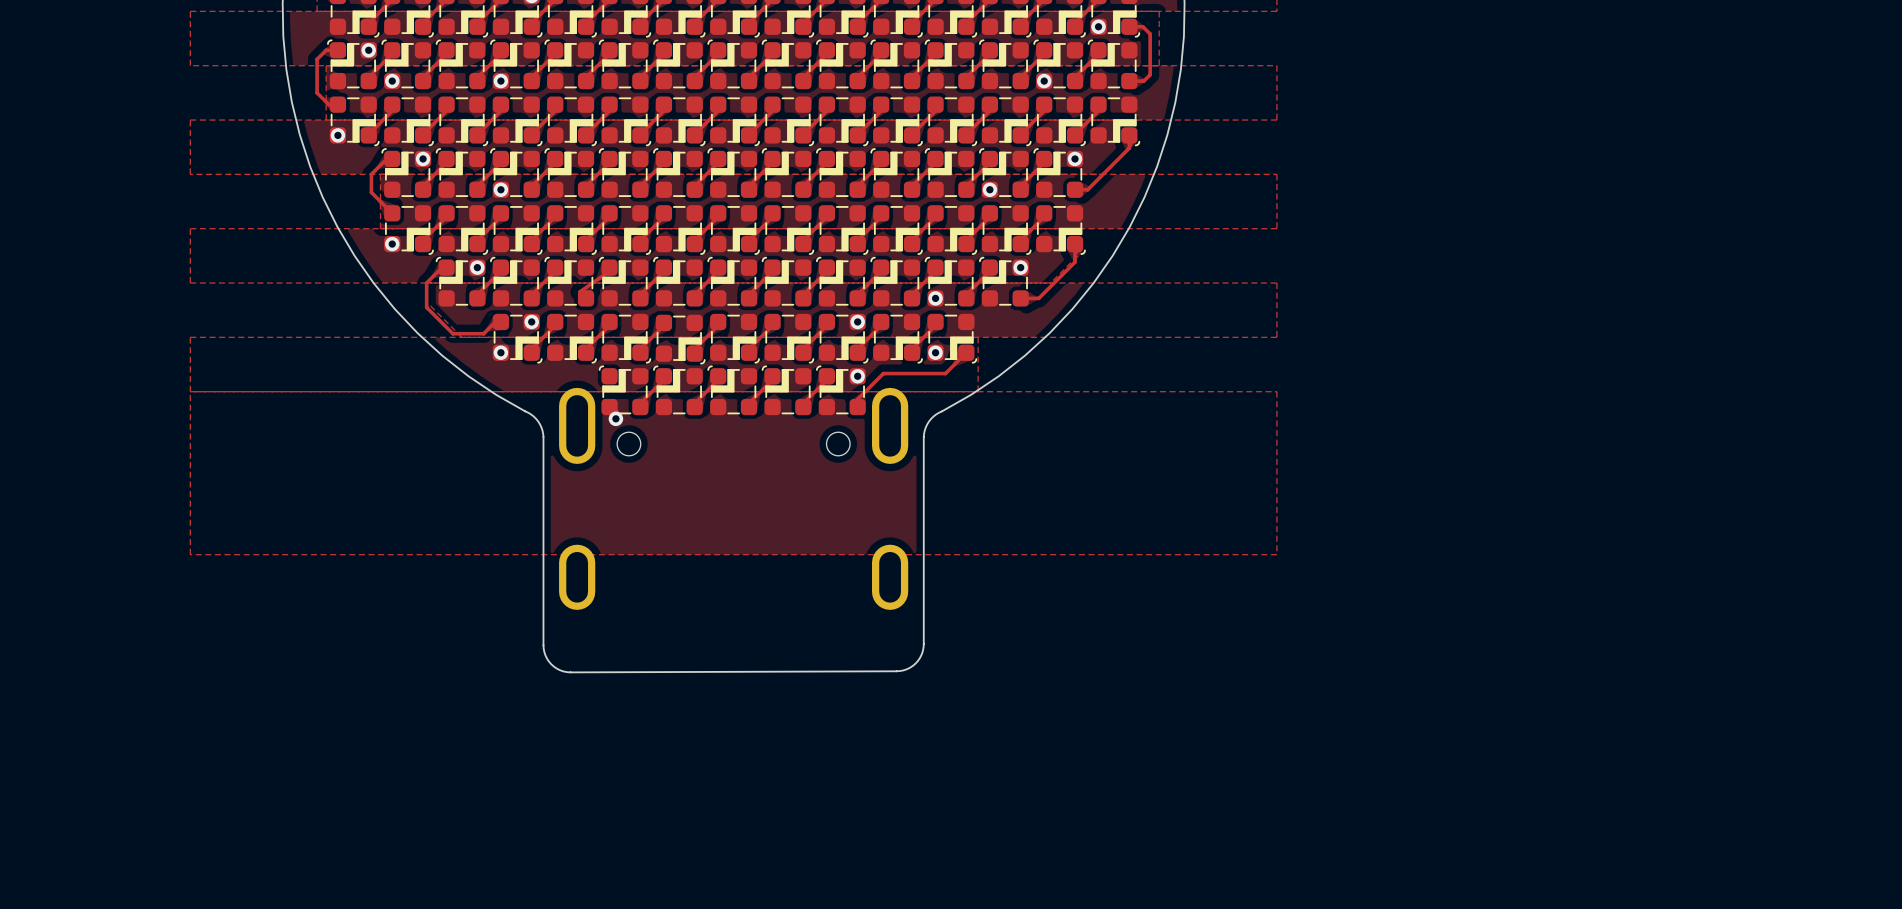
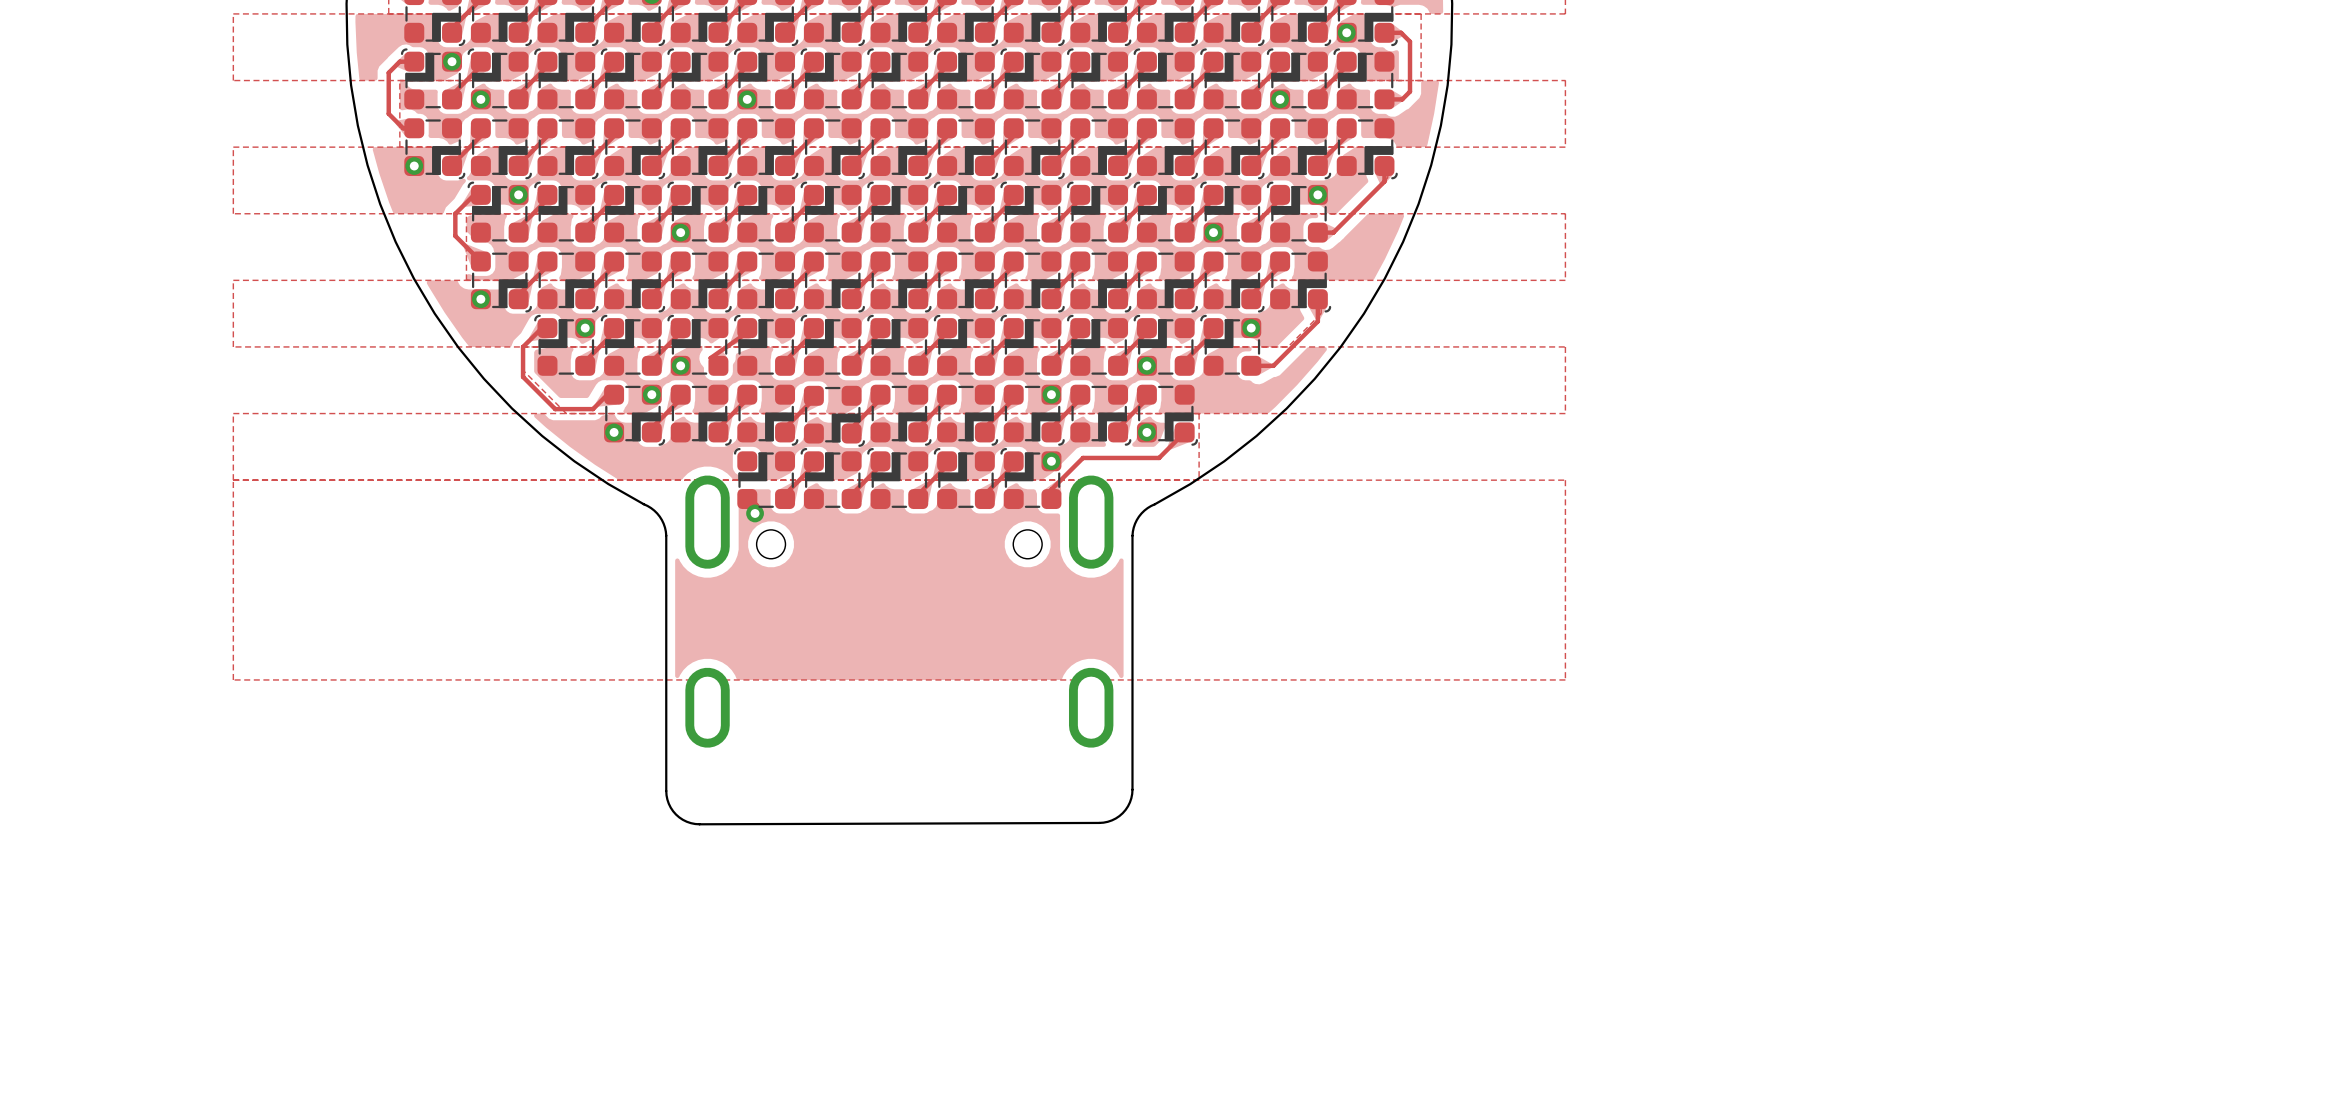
via: (500, 81) -> none
via: none -> (747, 99)
via position: (500, 189) -> (680, 232)
via: none -> (680, 365)

